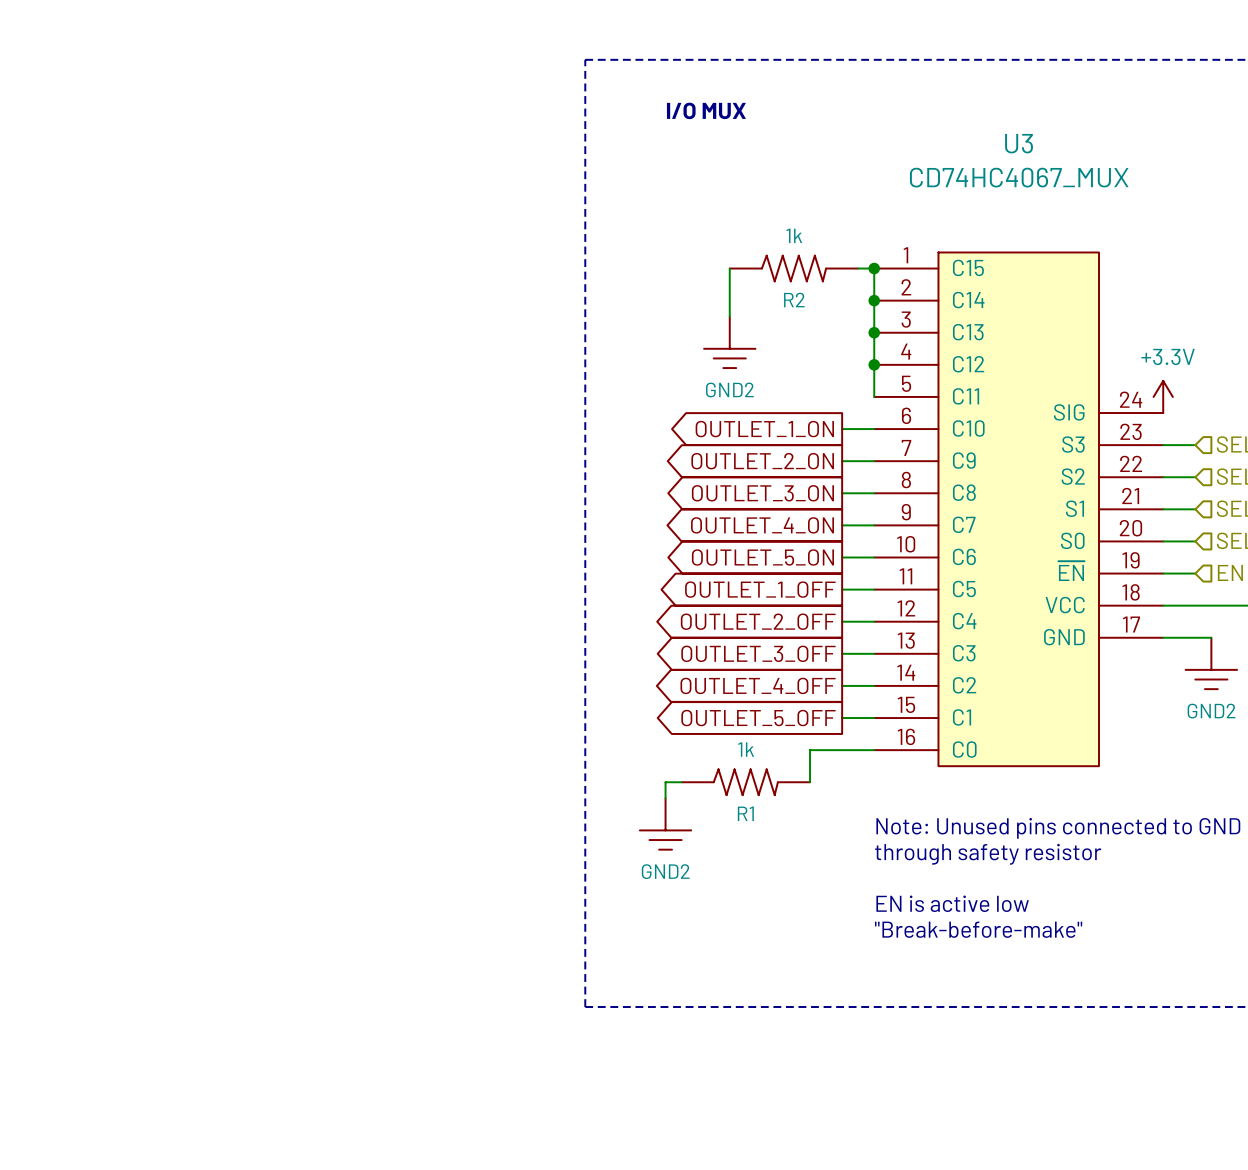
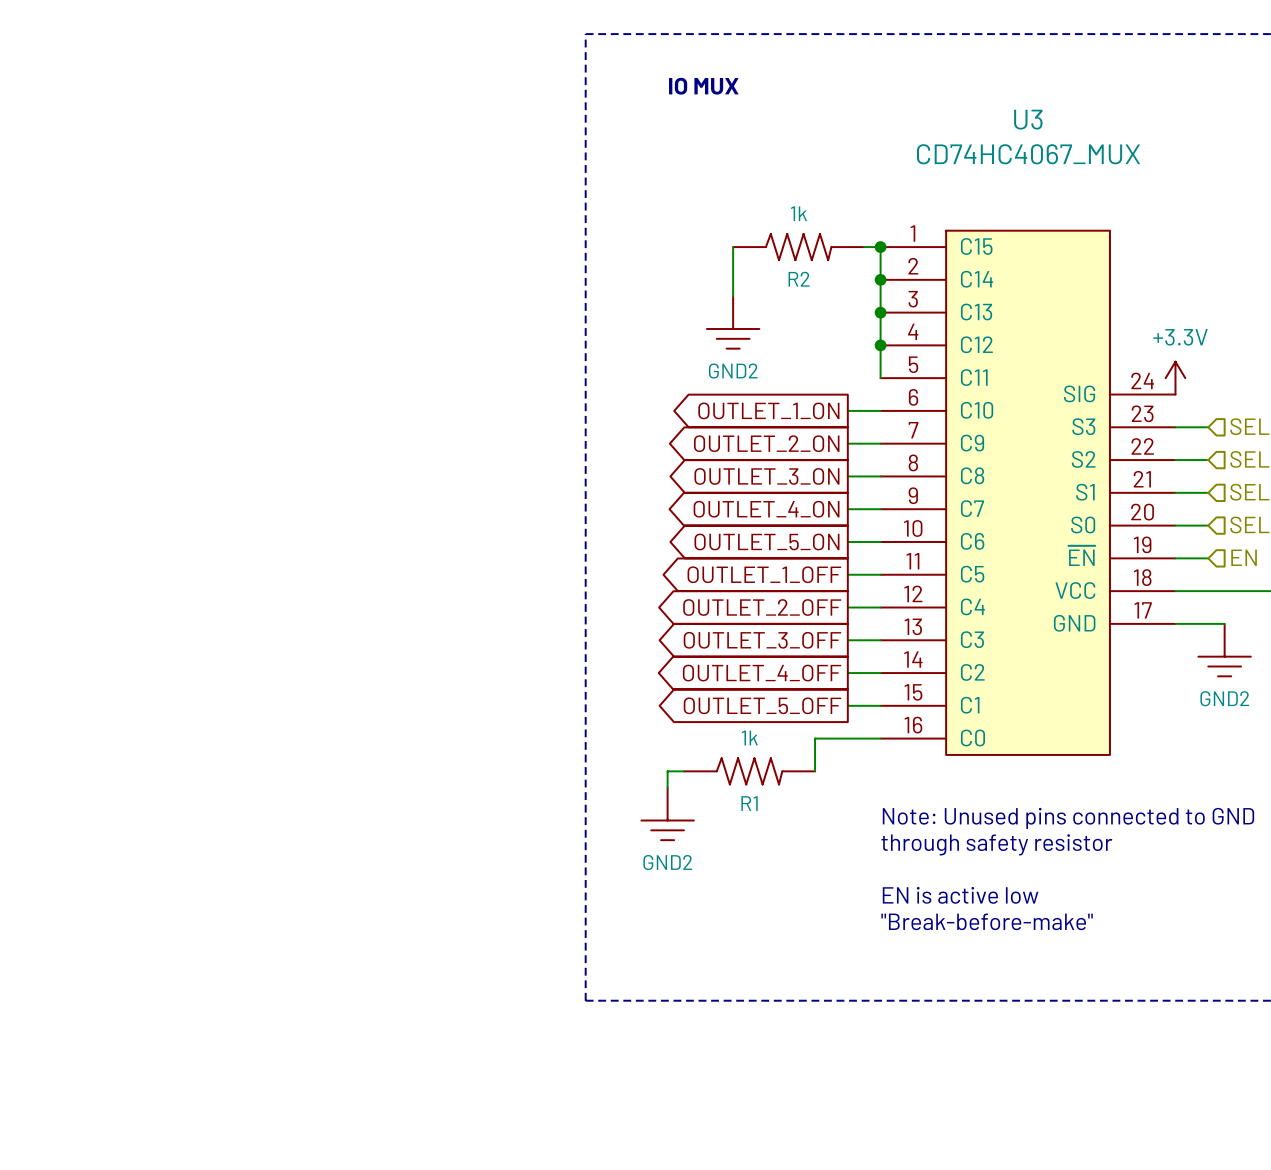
text: I/O MUX (706, 110) -> IO MUX (703, 86)

